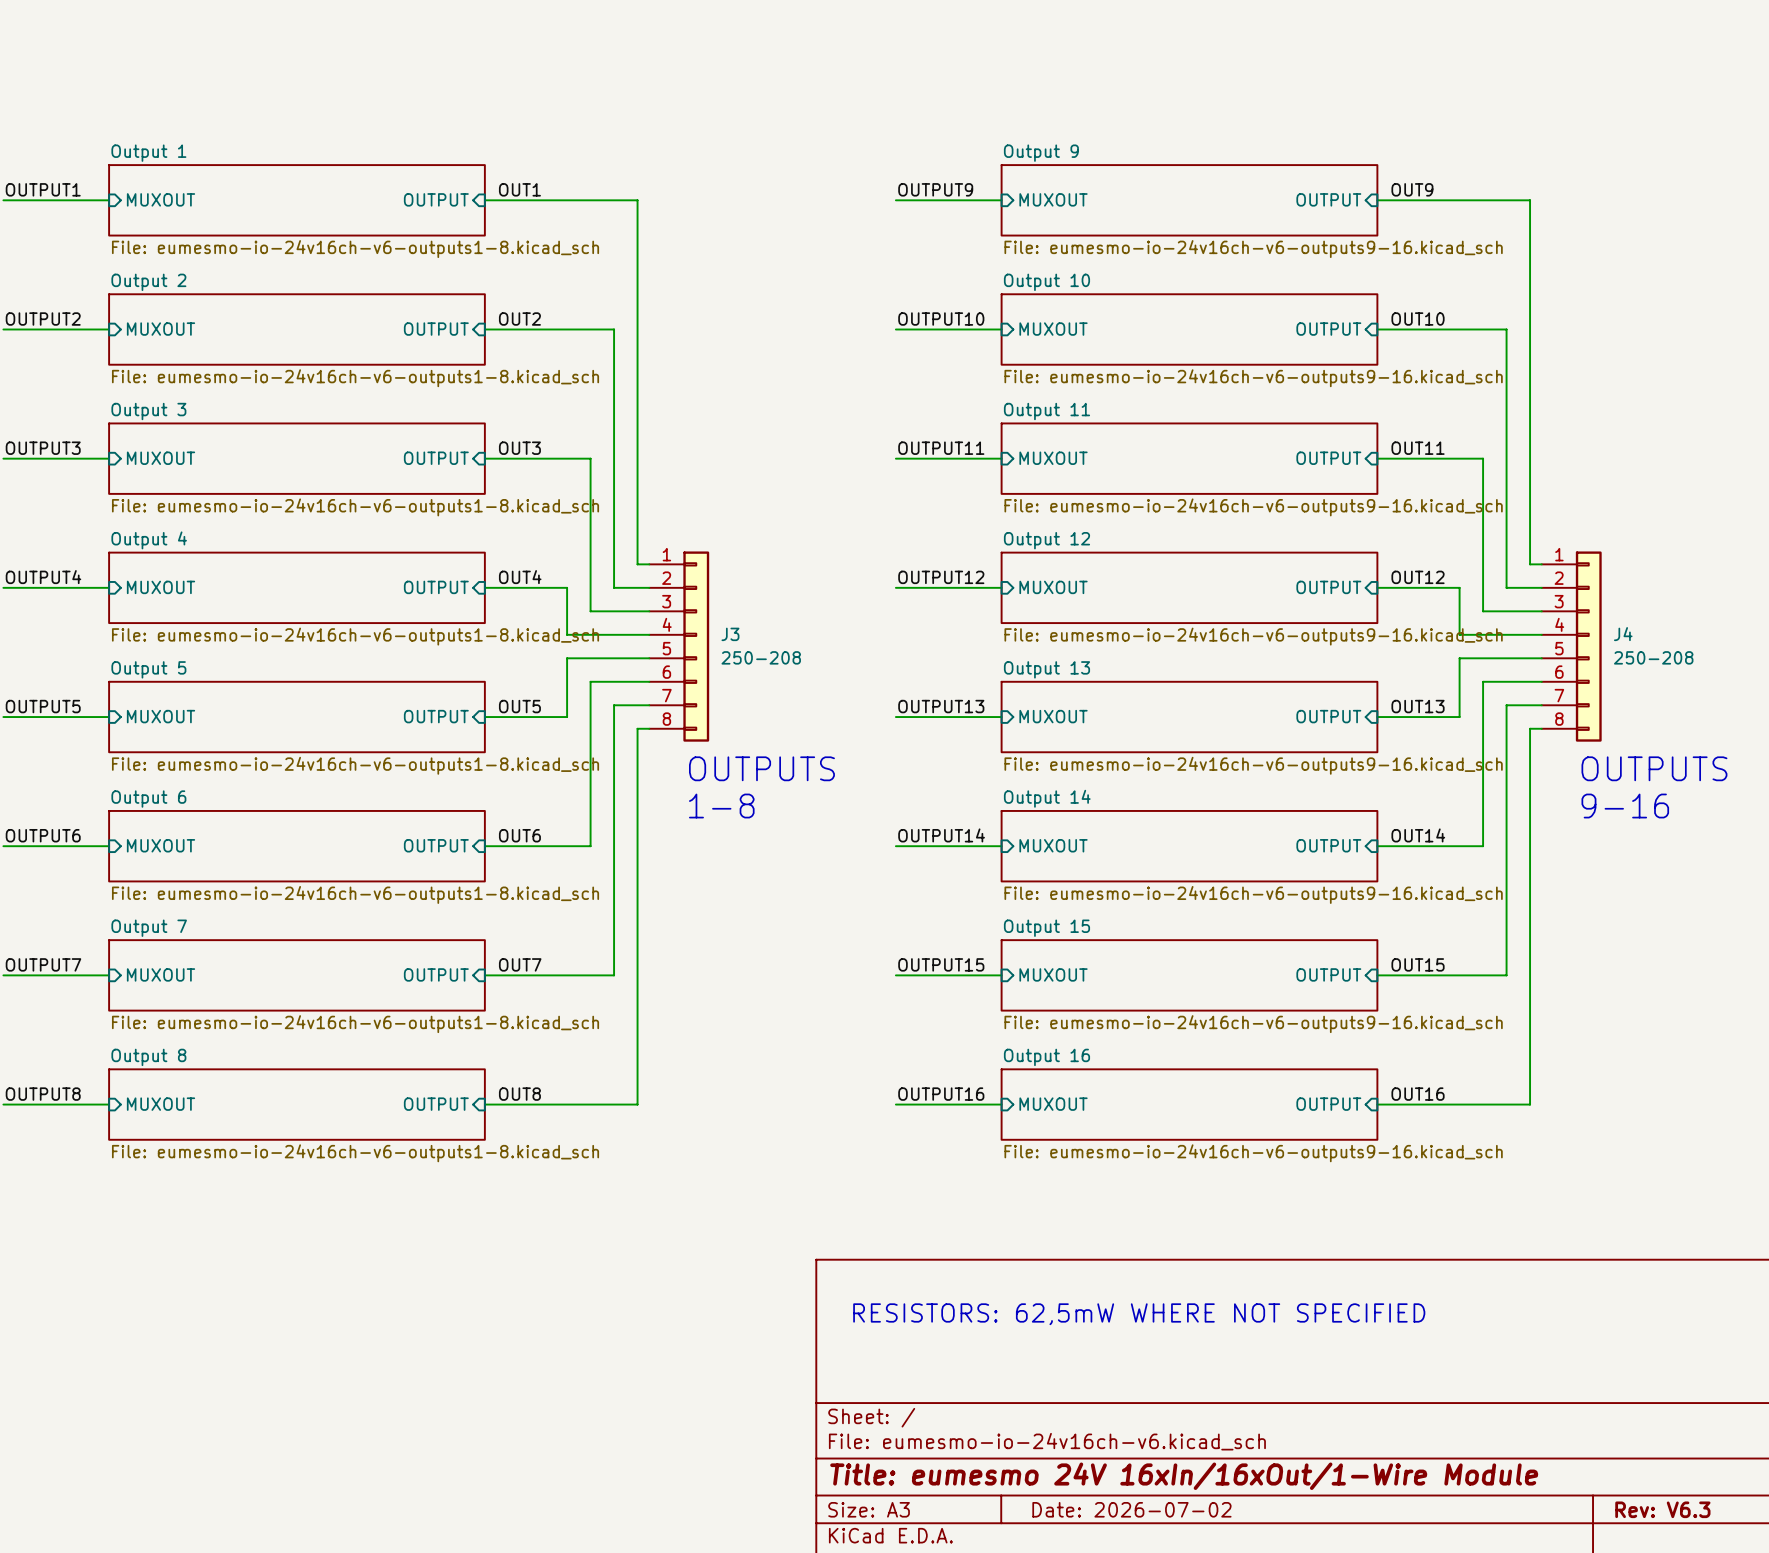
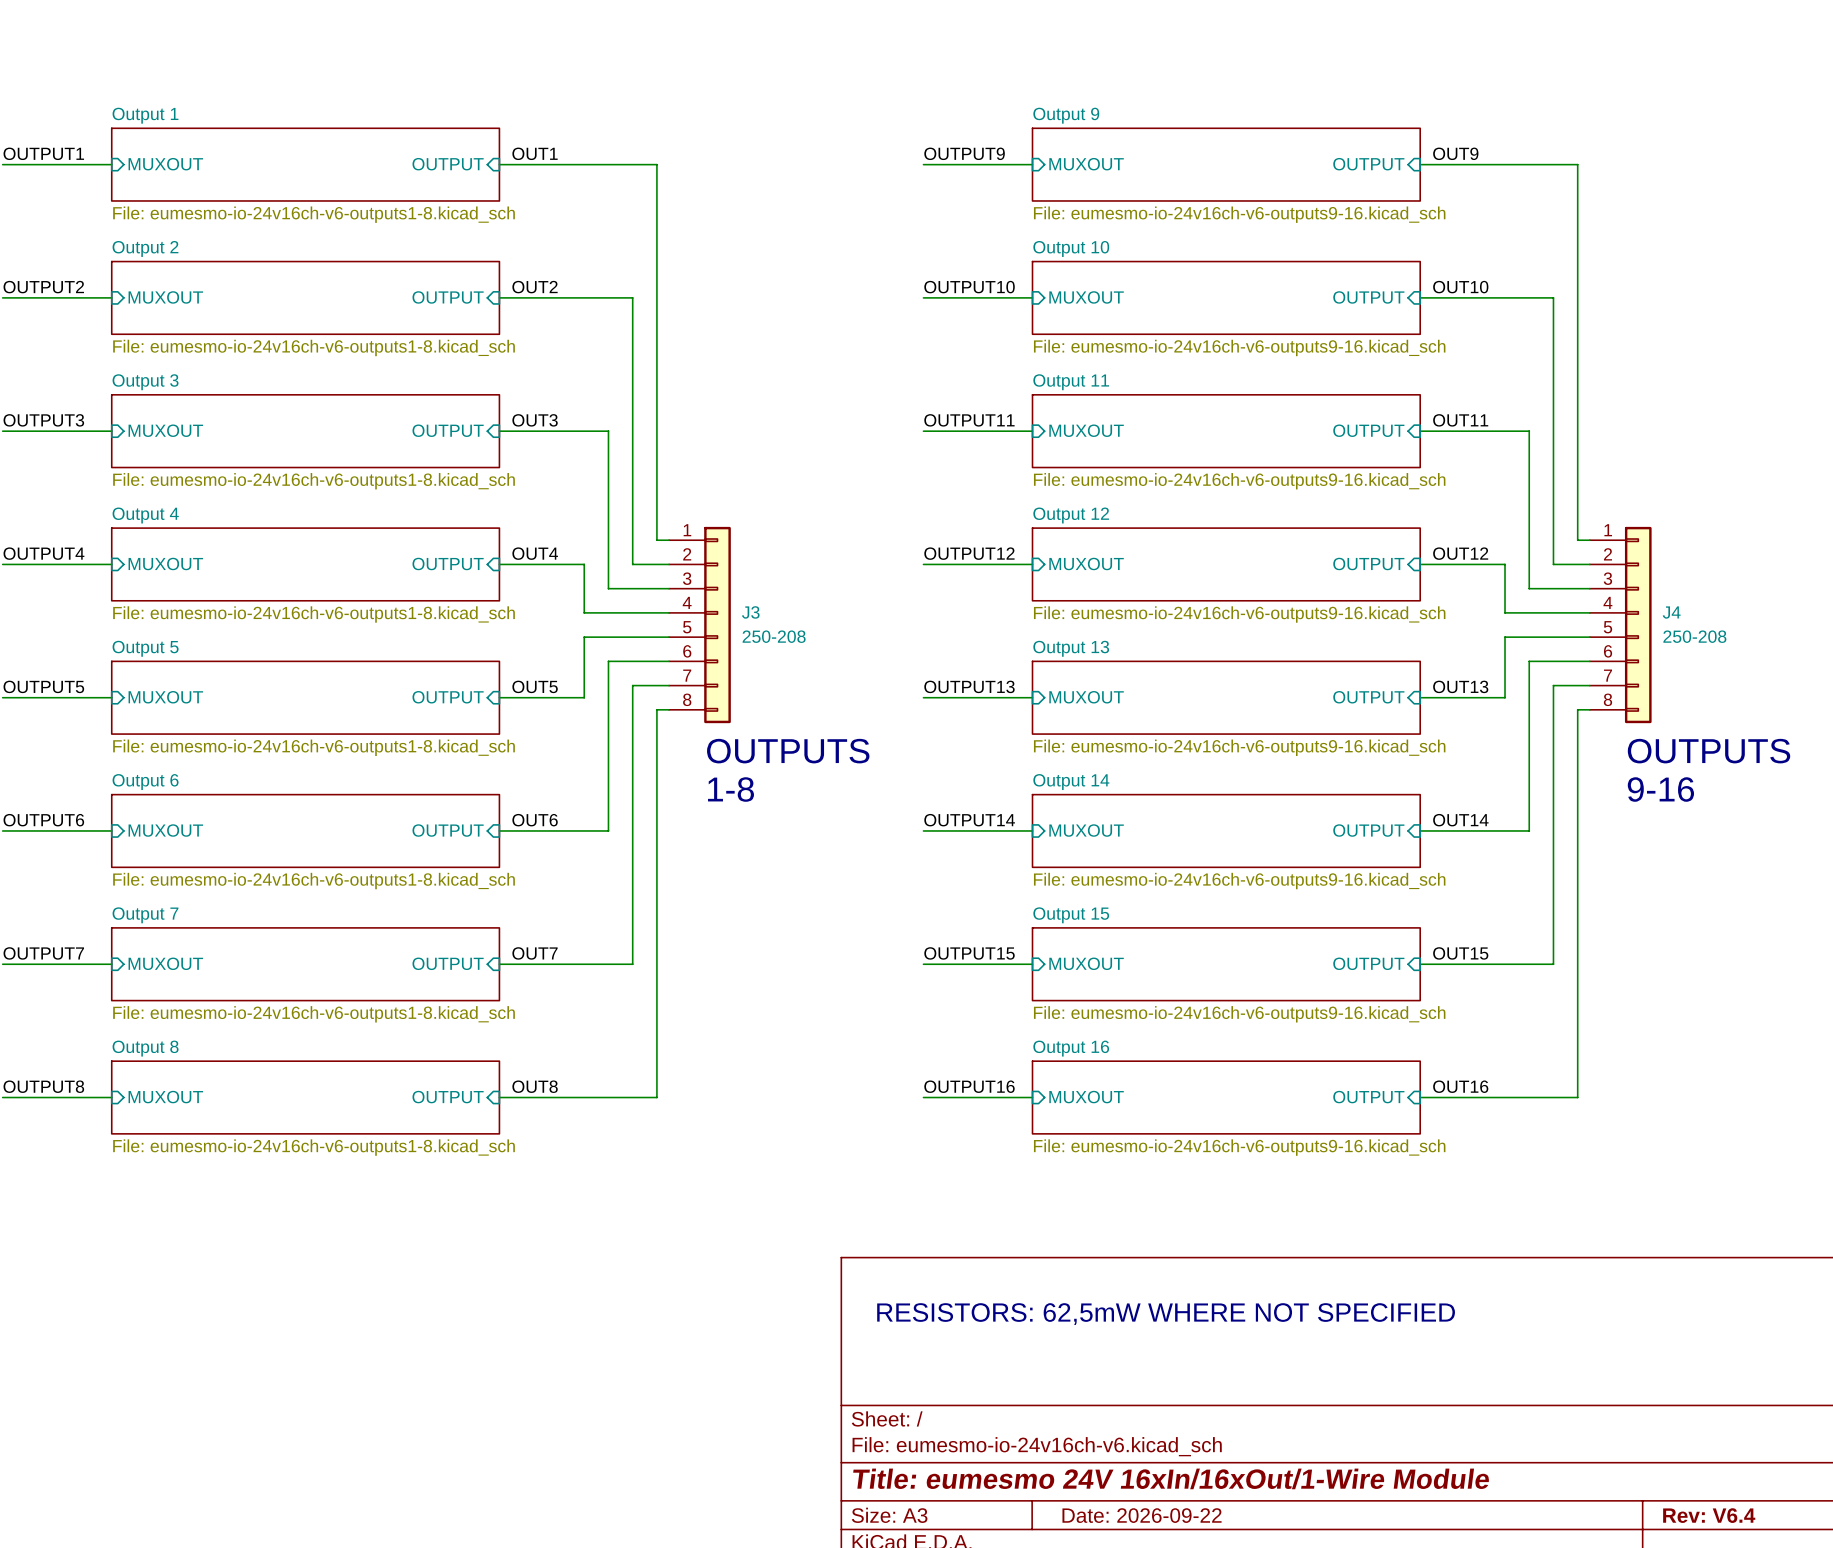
title block: Date: 2026-07-02 (1131, 1509) -> Date: 2026-09-22 (1142, 1515)
title block: Rev: V6.3 (1662, 1509) -> Rev: V6.4 (1709, 1515)

